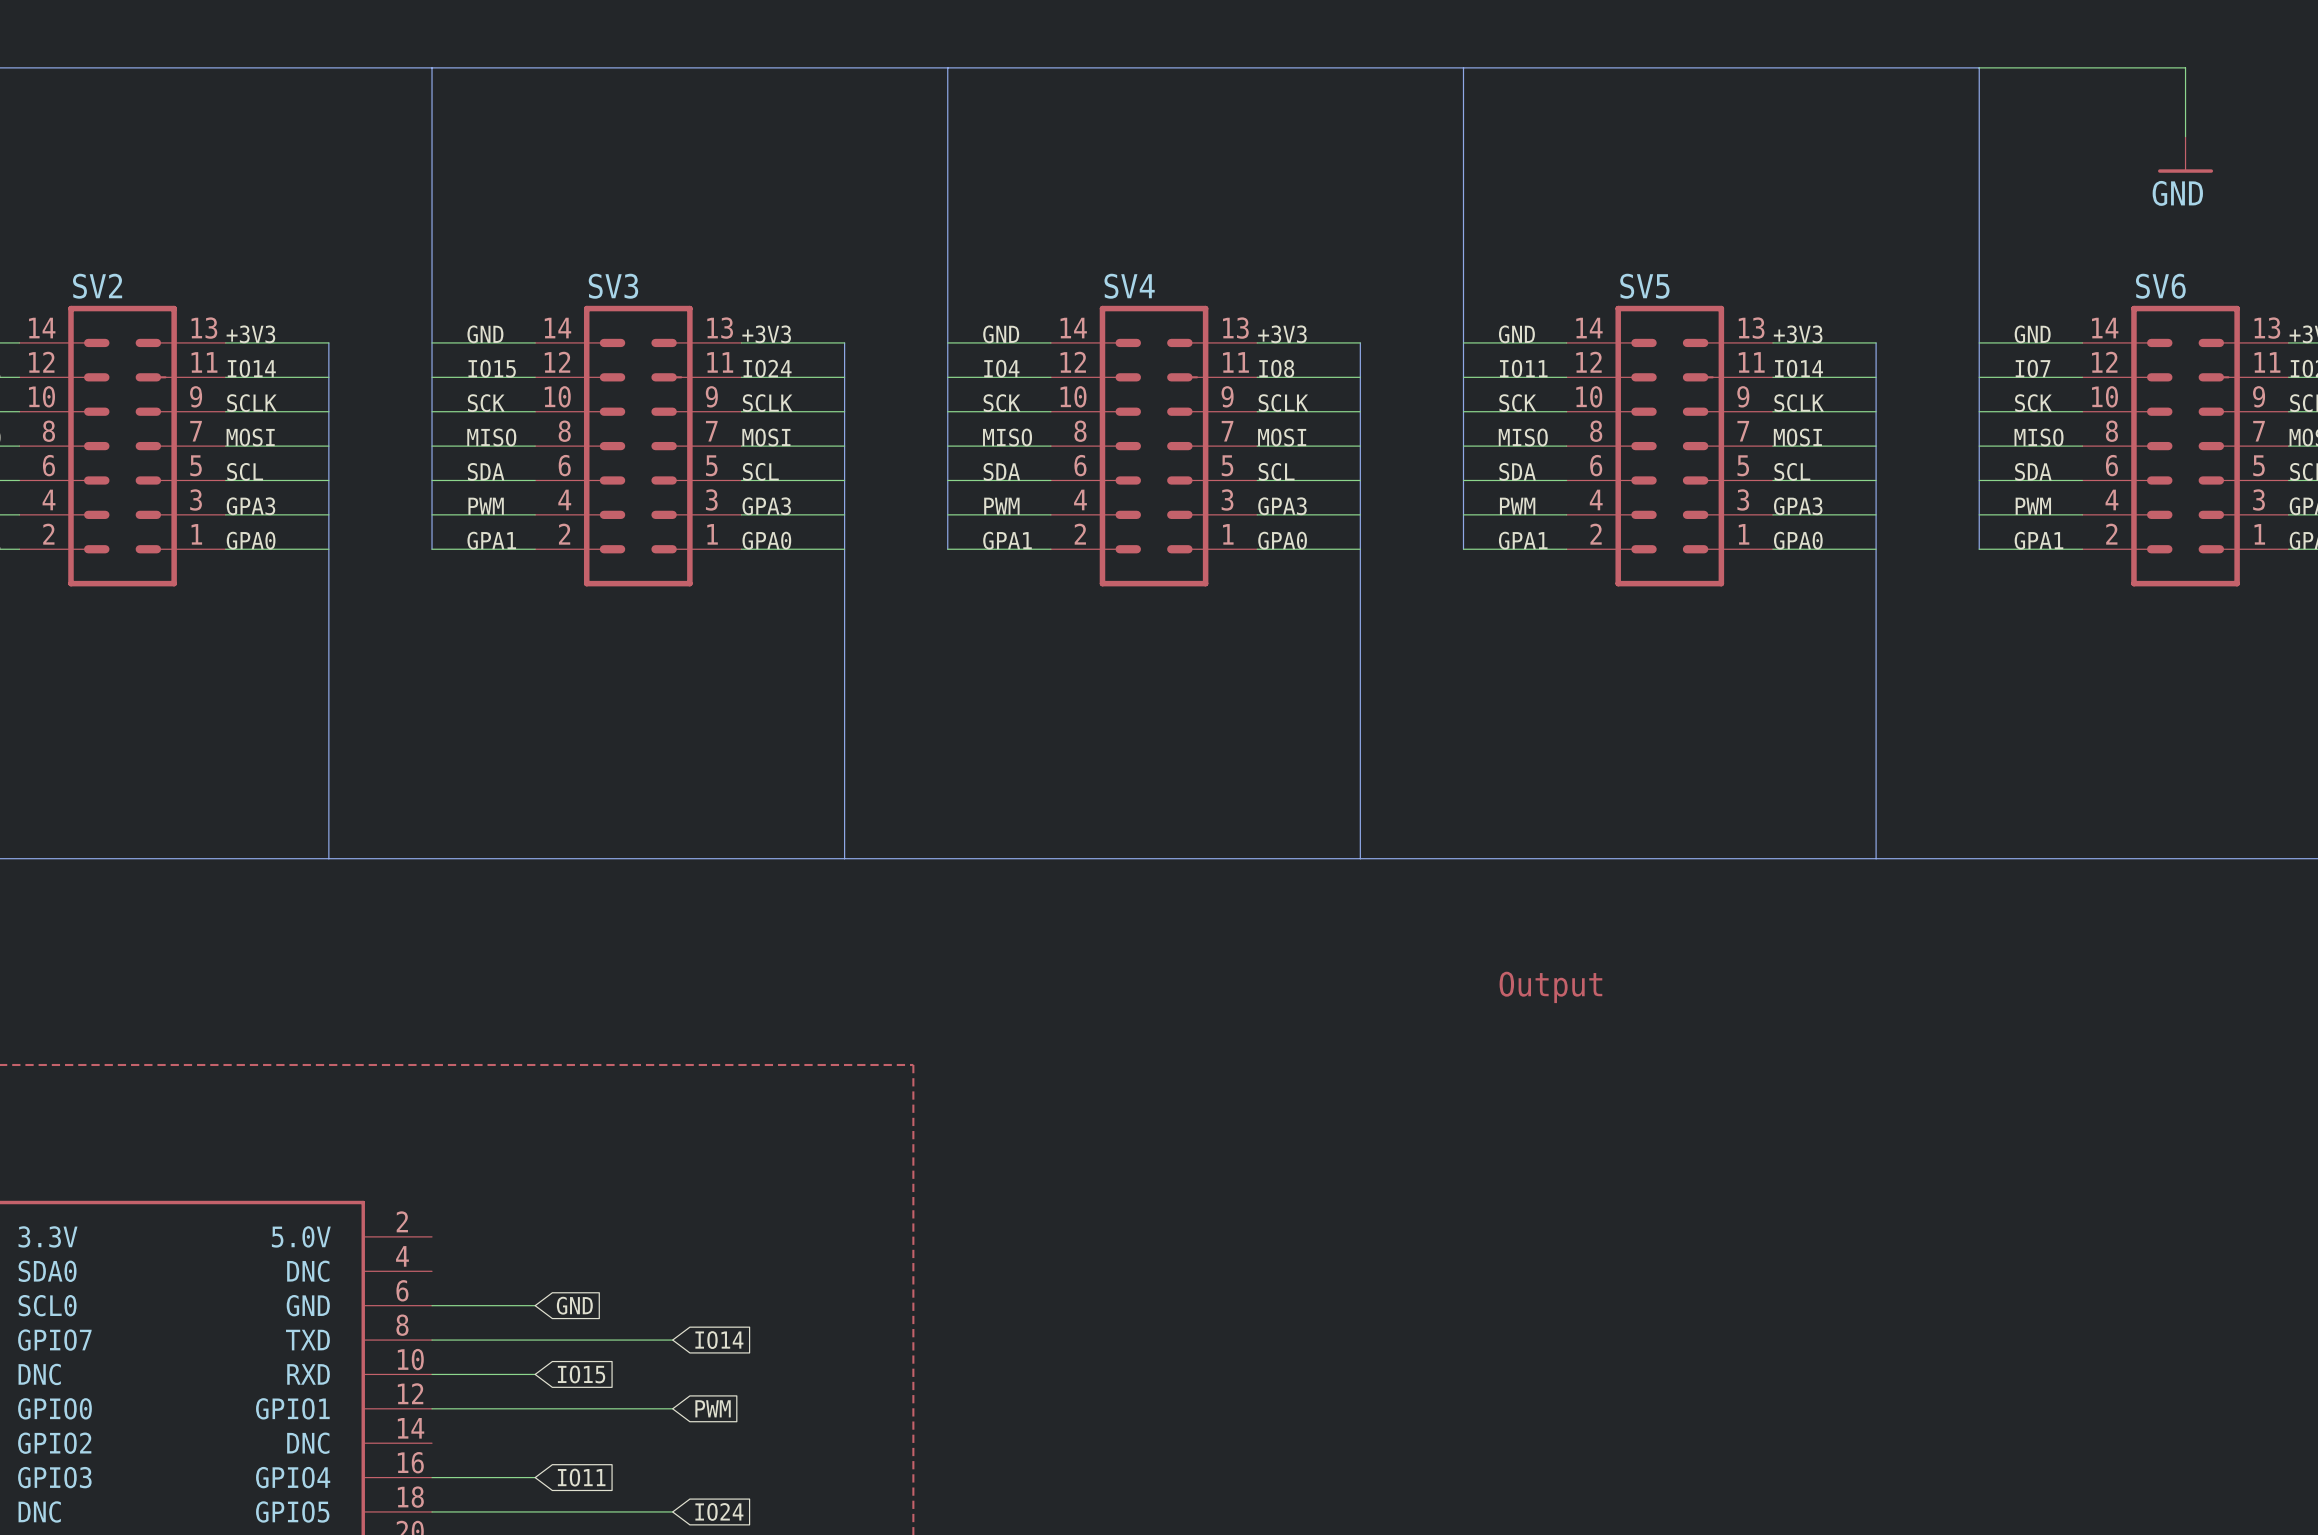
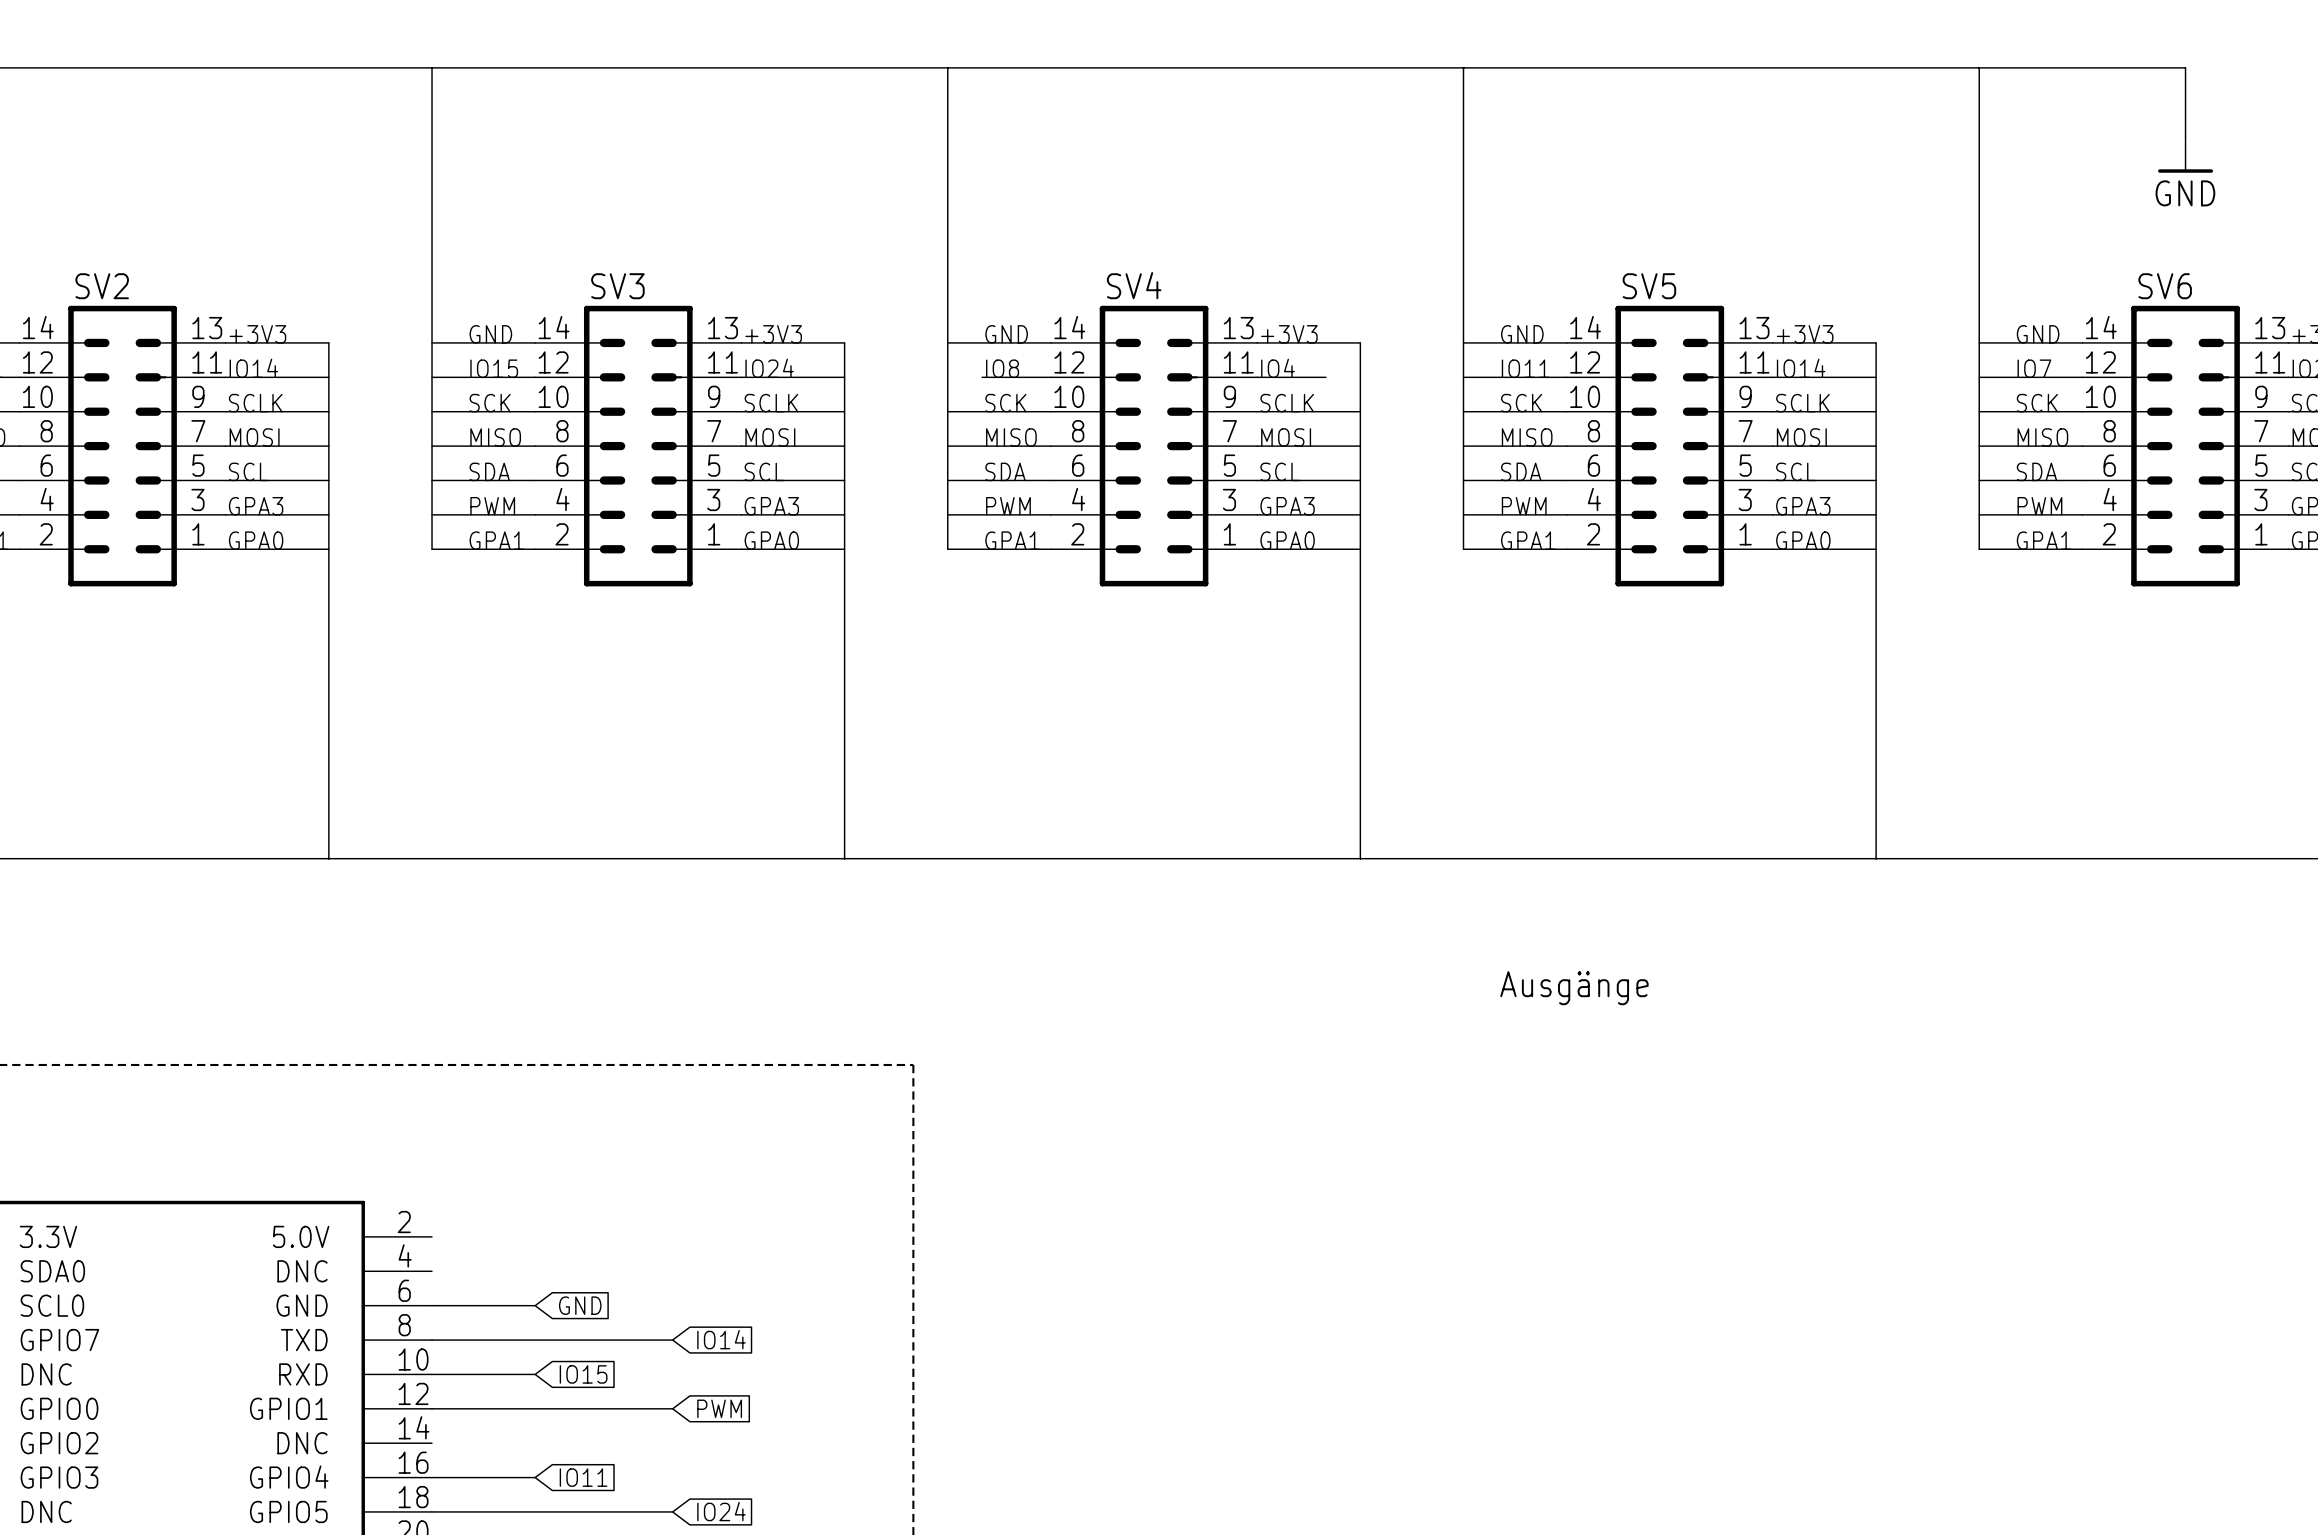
label: IO4 (1001, 368) -> IO8 (1002, 368)
label: IO8 (1276, 368) -> IO4 (1277, 368)
wire: (947, 377) (982, 377) -> none
wire: (1325, 377) (1360, 377) -> none
text: Output (1550, 987) -> Ausgänge (1574, 988)

